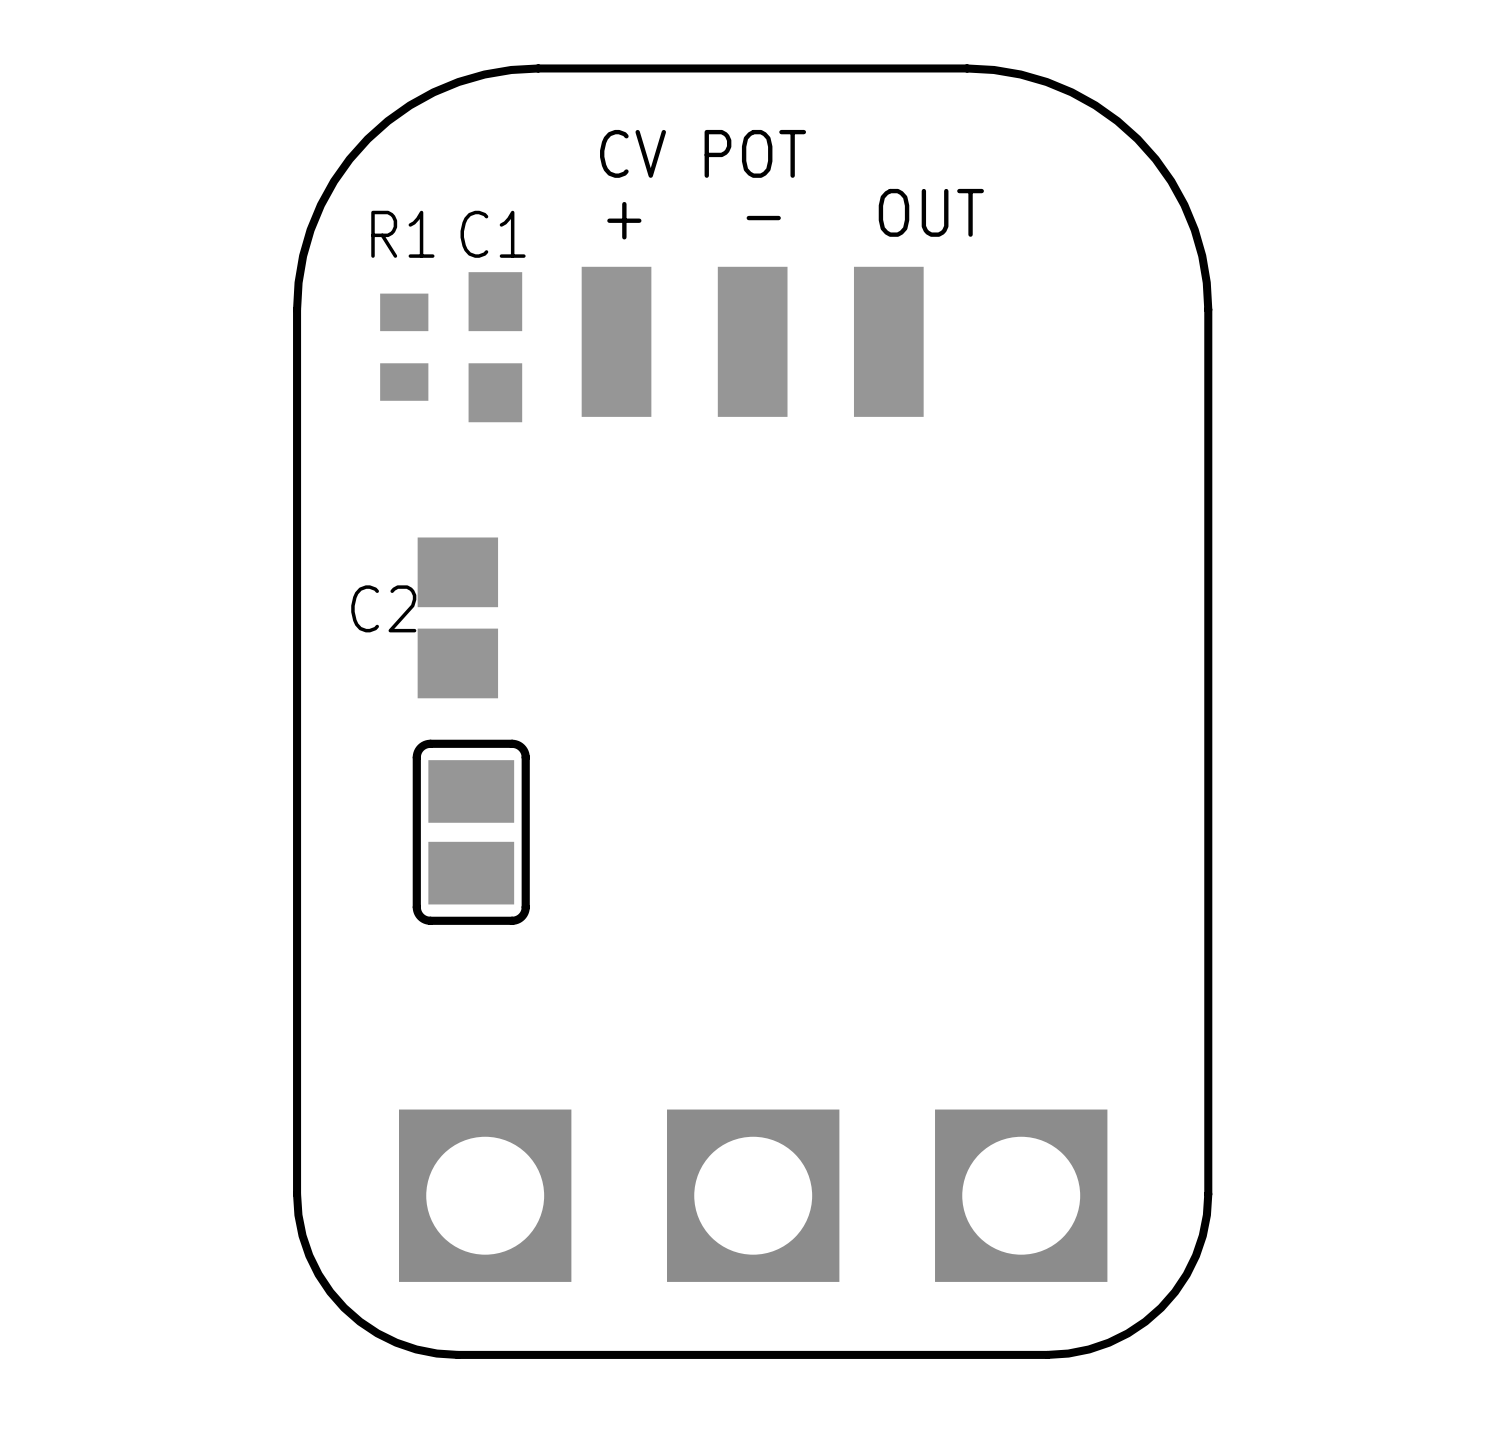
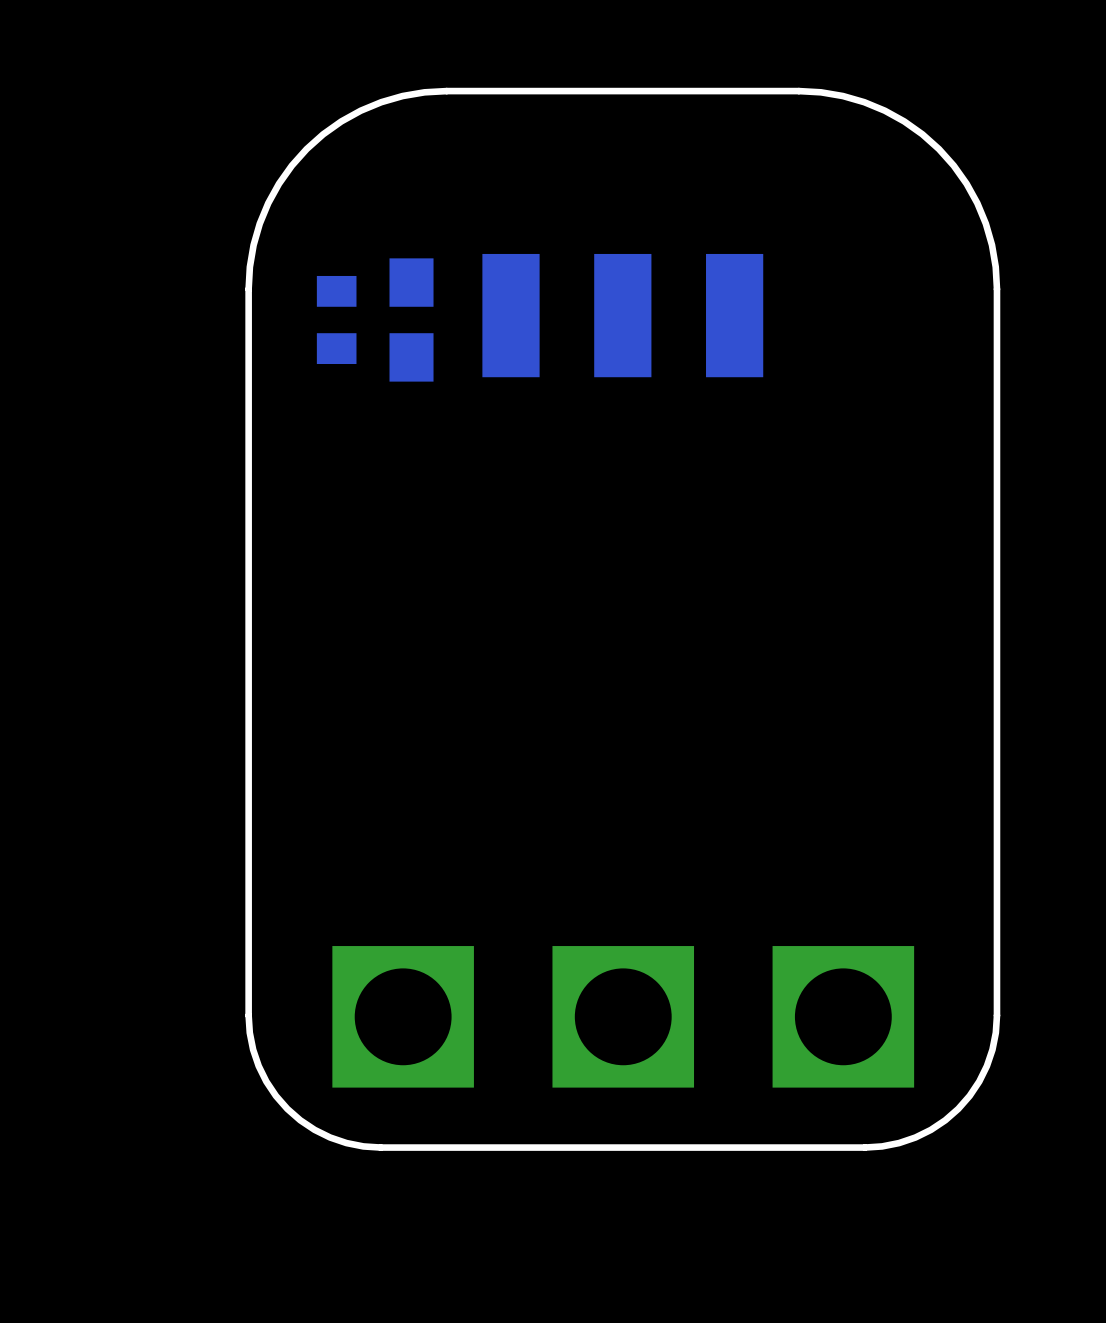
text: CV POT (703, 153) -> none
text: OUT (931, 212) -> none
text: - (763, 218) -> none
text: + (624, 220) -> none
text: R1 (402, 234) -> none
text: C1 (493, 234) -> none
C2: (457, 617) -> none
part: (471, 832) -> none

